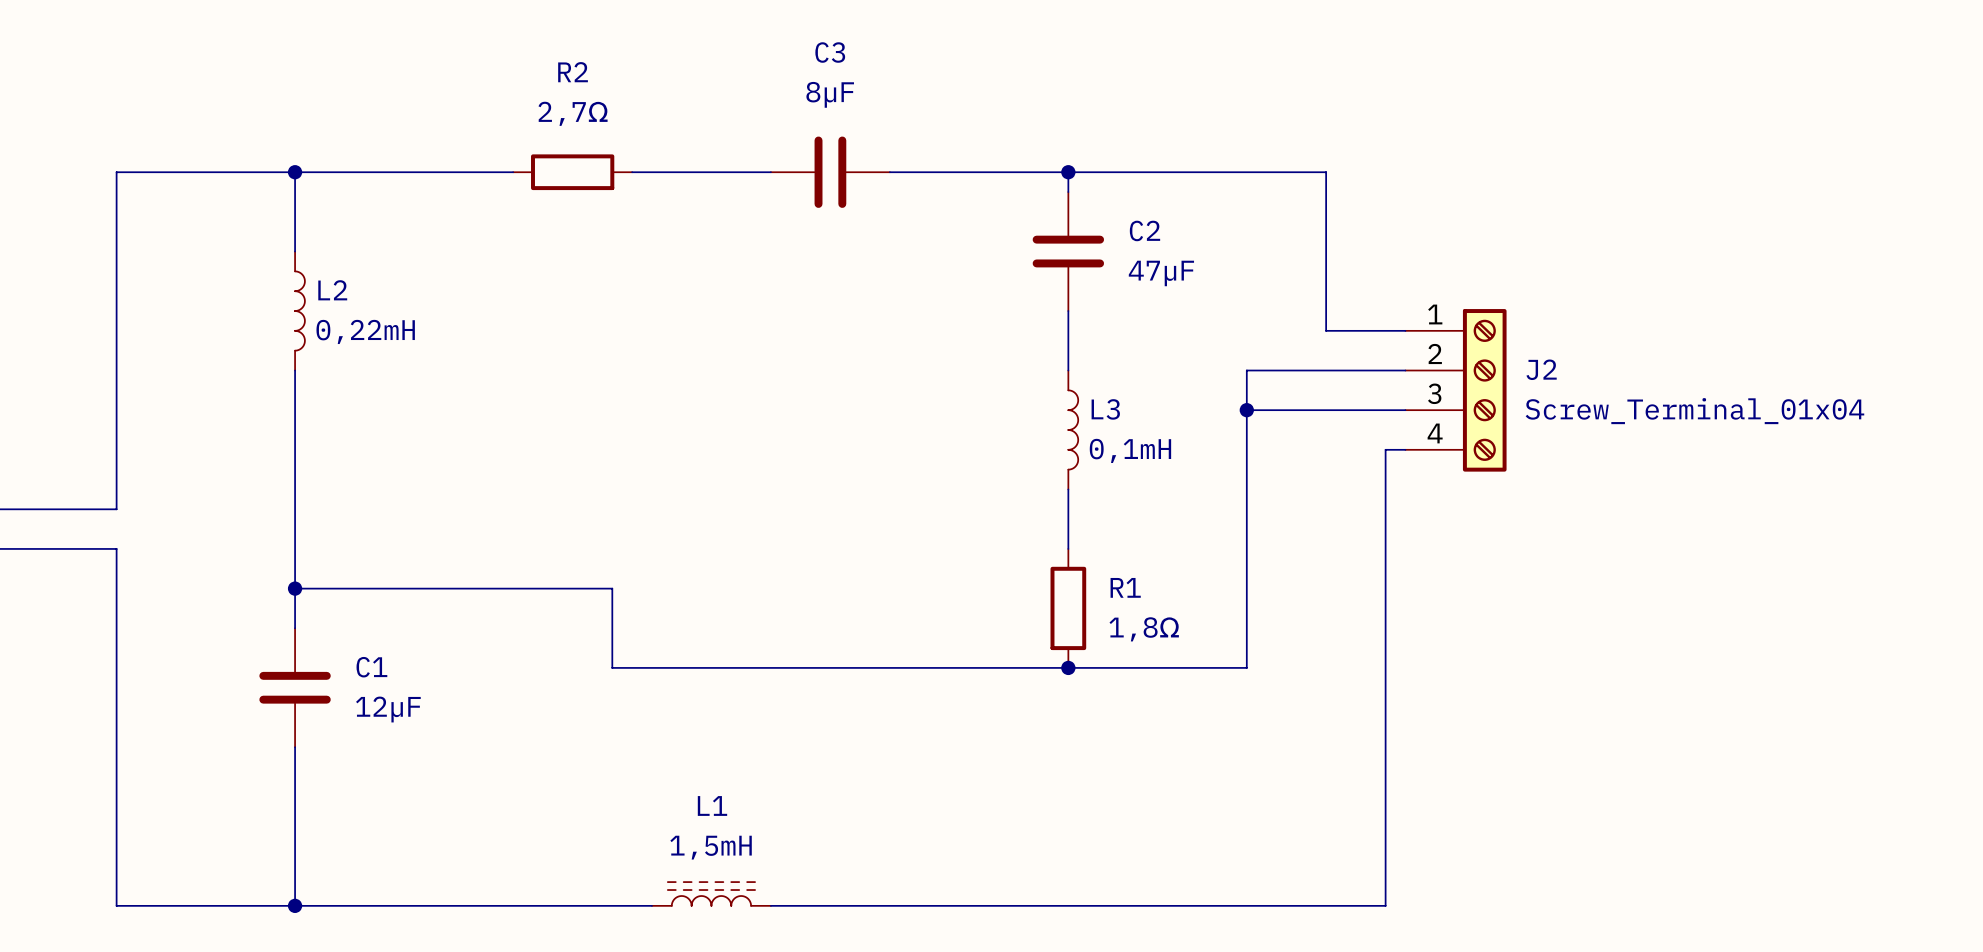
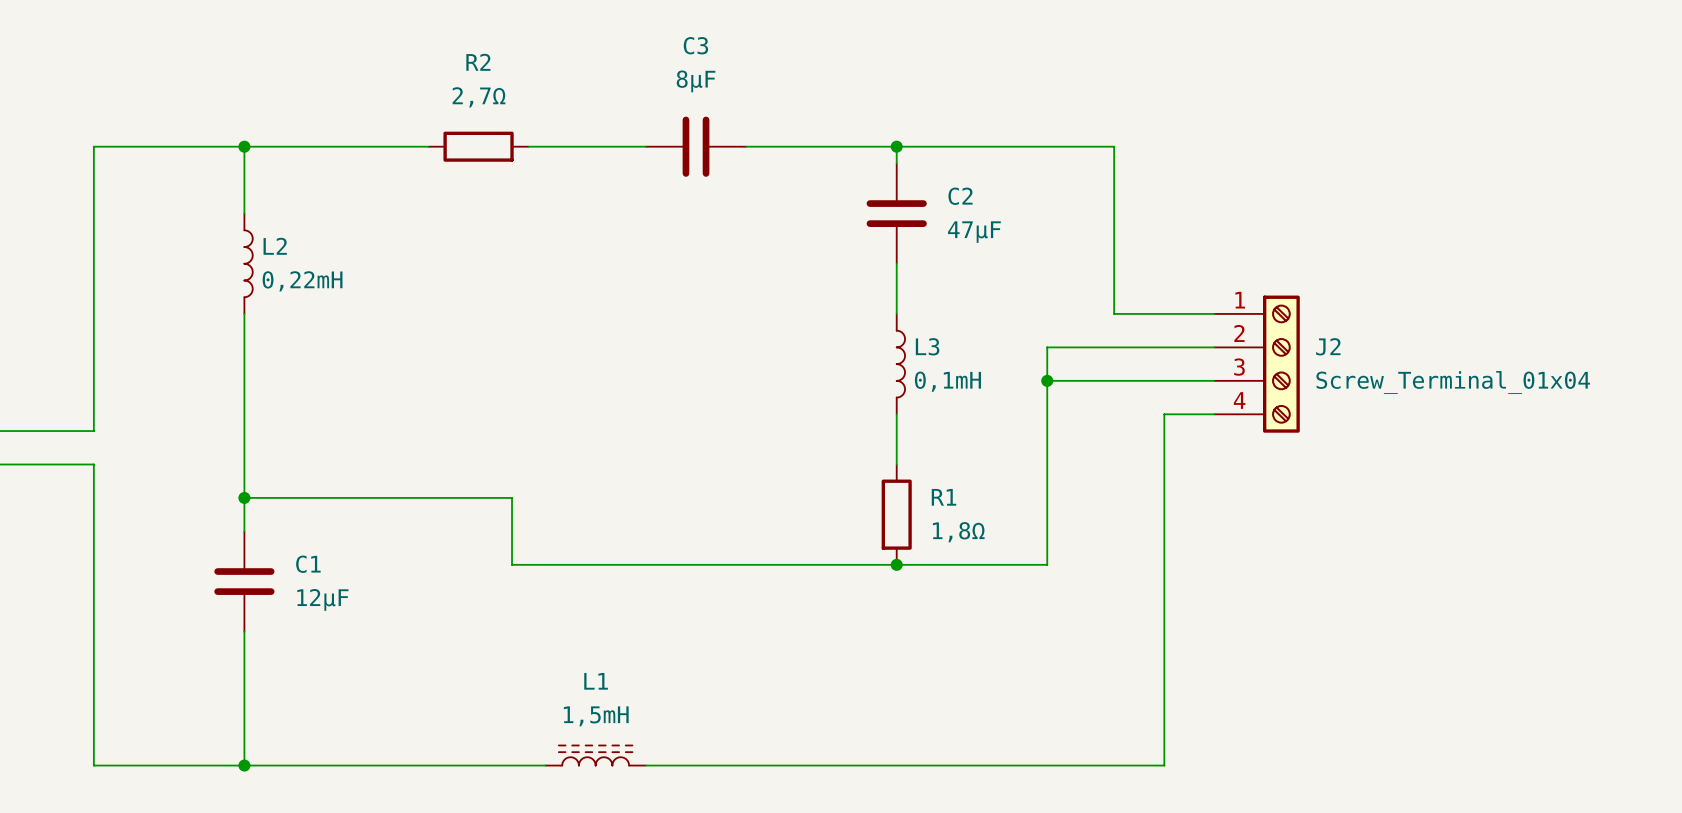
wire: (1326, 330) (1405, 330) -> (1114, 280) (1114, 313)
wire: (1326, 370) (1246, 370) (1246, 410) -> none
J2 position: (1455, 390) -> (1257, 364)
junction position: (1246, 410) -> (1047, 380)
wire: none -> (1047, 380) (1164, 380)
wire: (1385, 449) (1385, 489) -> (1214, 414) (1164, 414)

